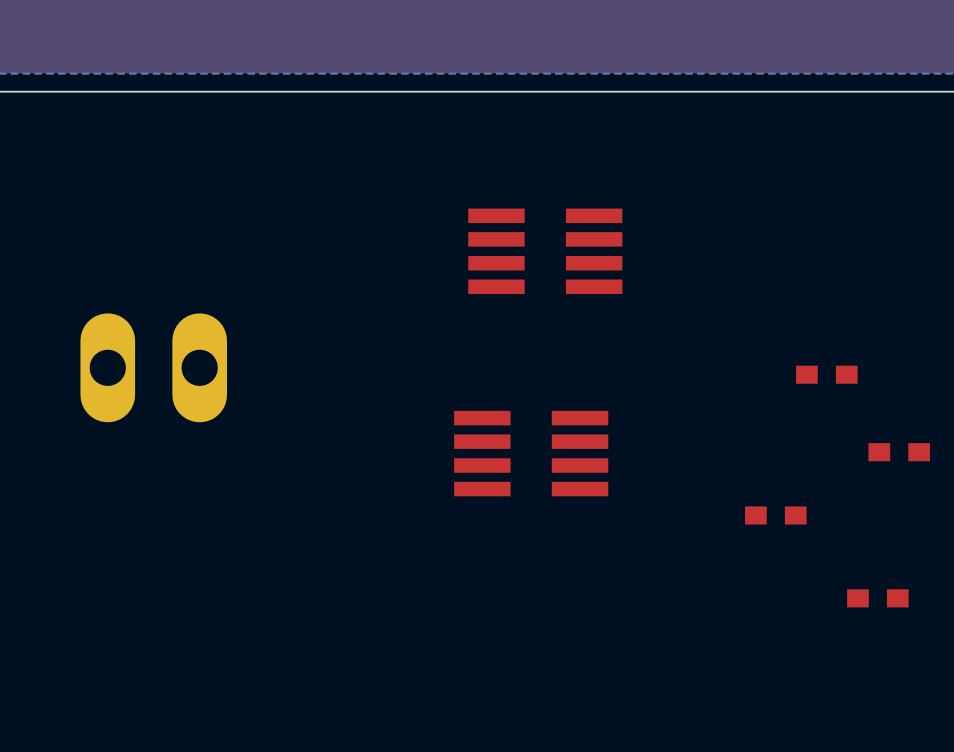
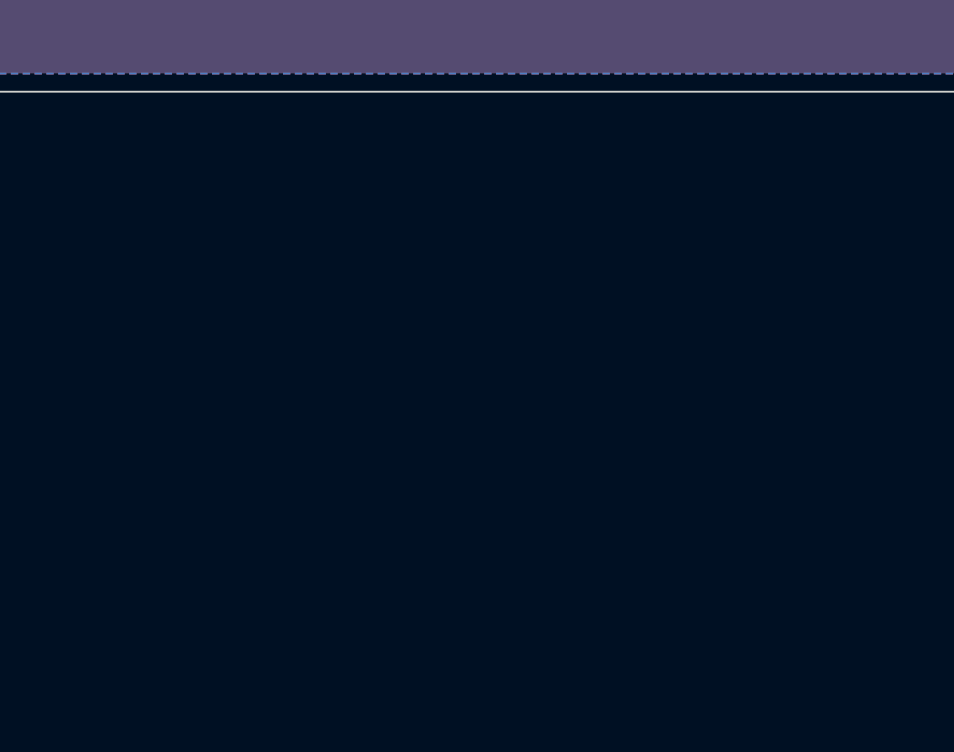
part: (545, 251) -> none
part: (153, 367) -> none
part: (826, 374) -> none
part: (899, 452) -> none
part: (531, 453) -> none
part: (775, 515) -> none
part: (877, 598) -> none

